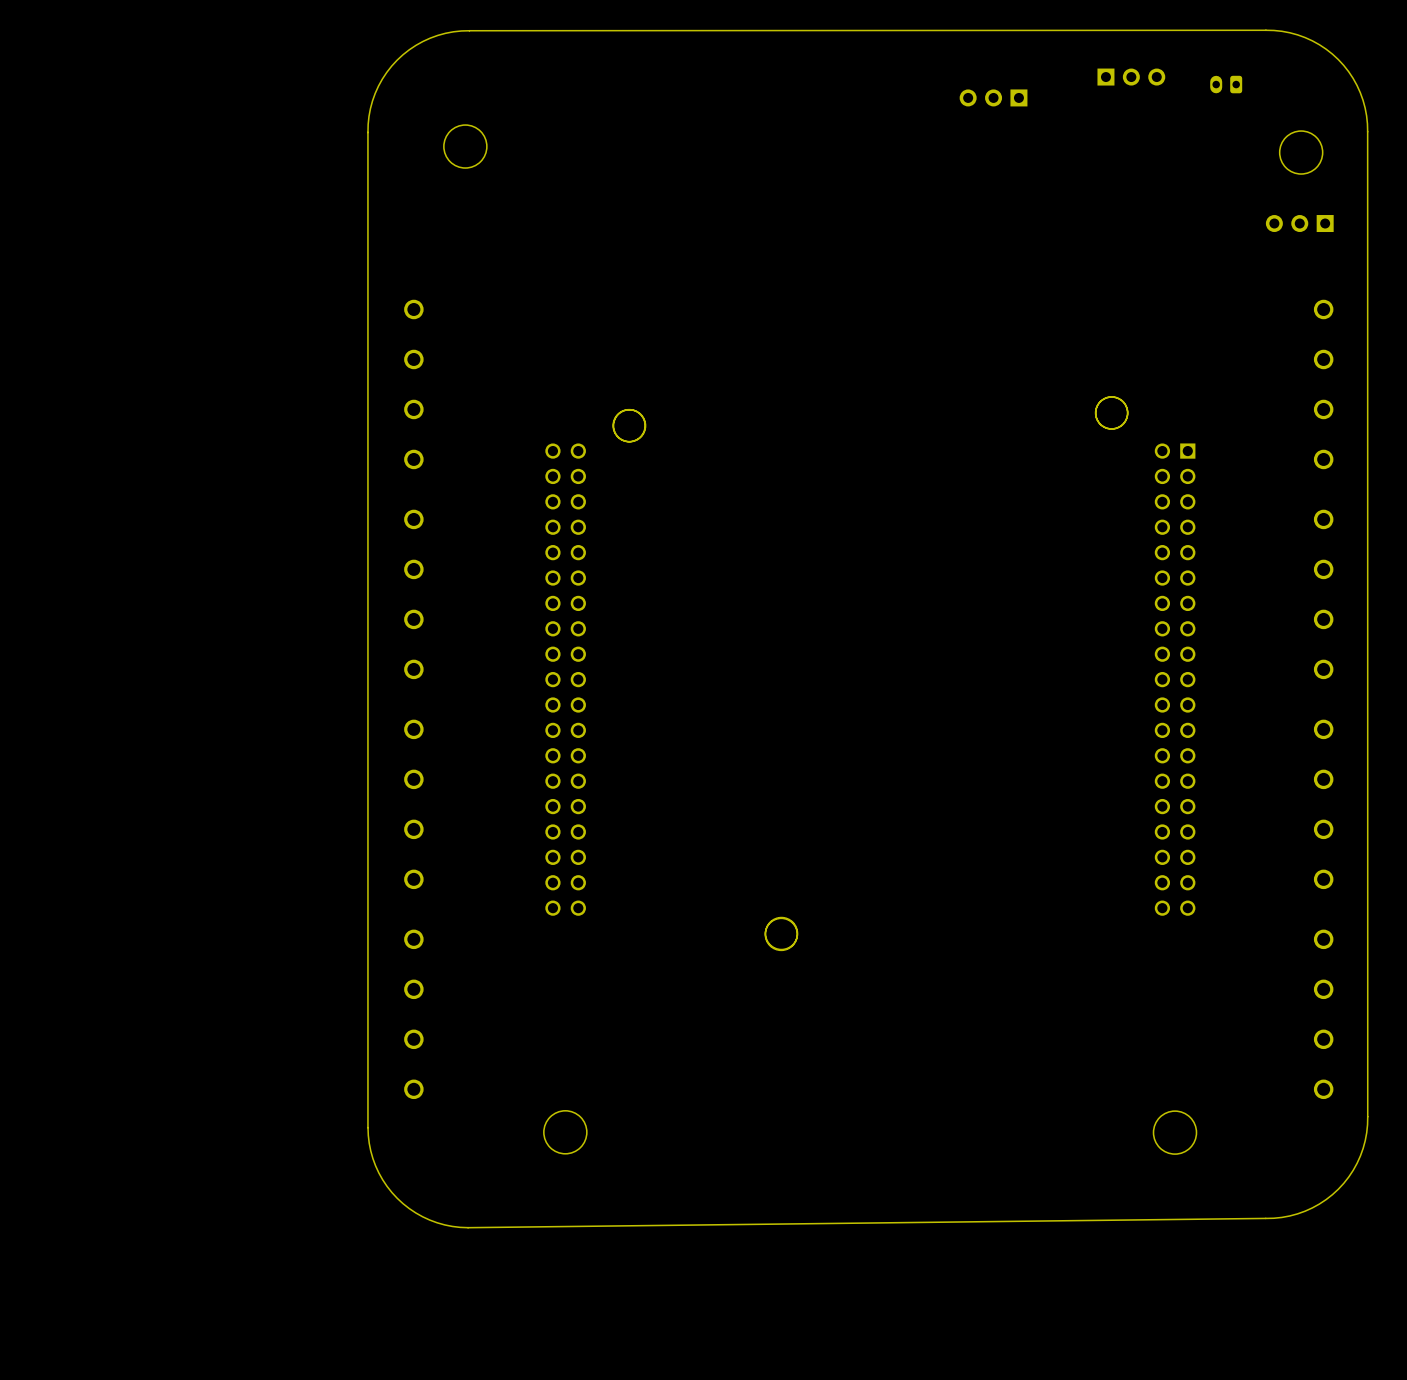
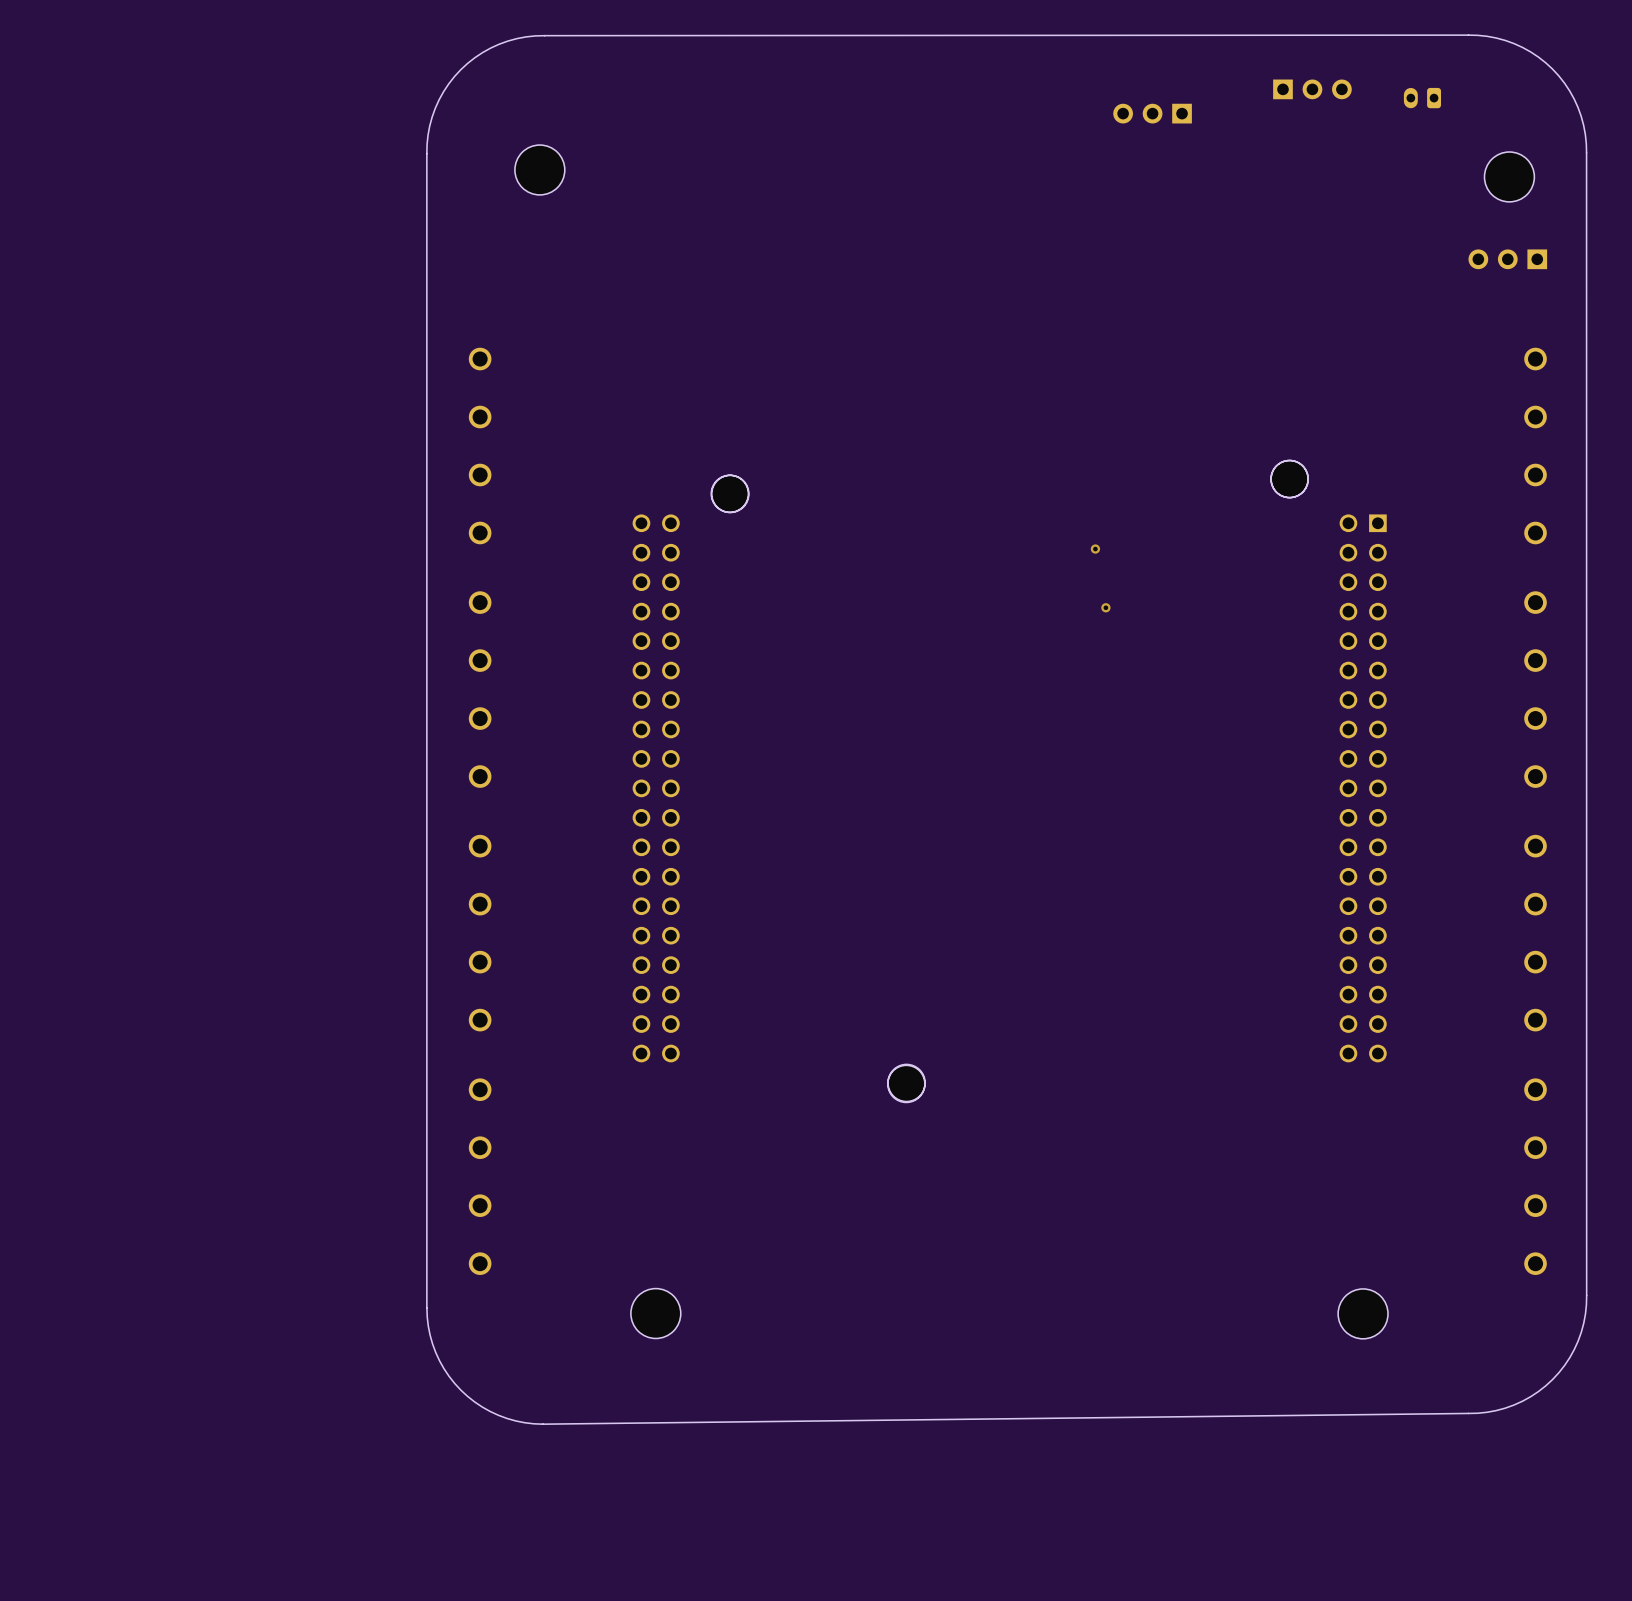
via: none -> (1095, 549)
via: none -> (1105, 607)

